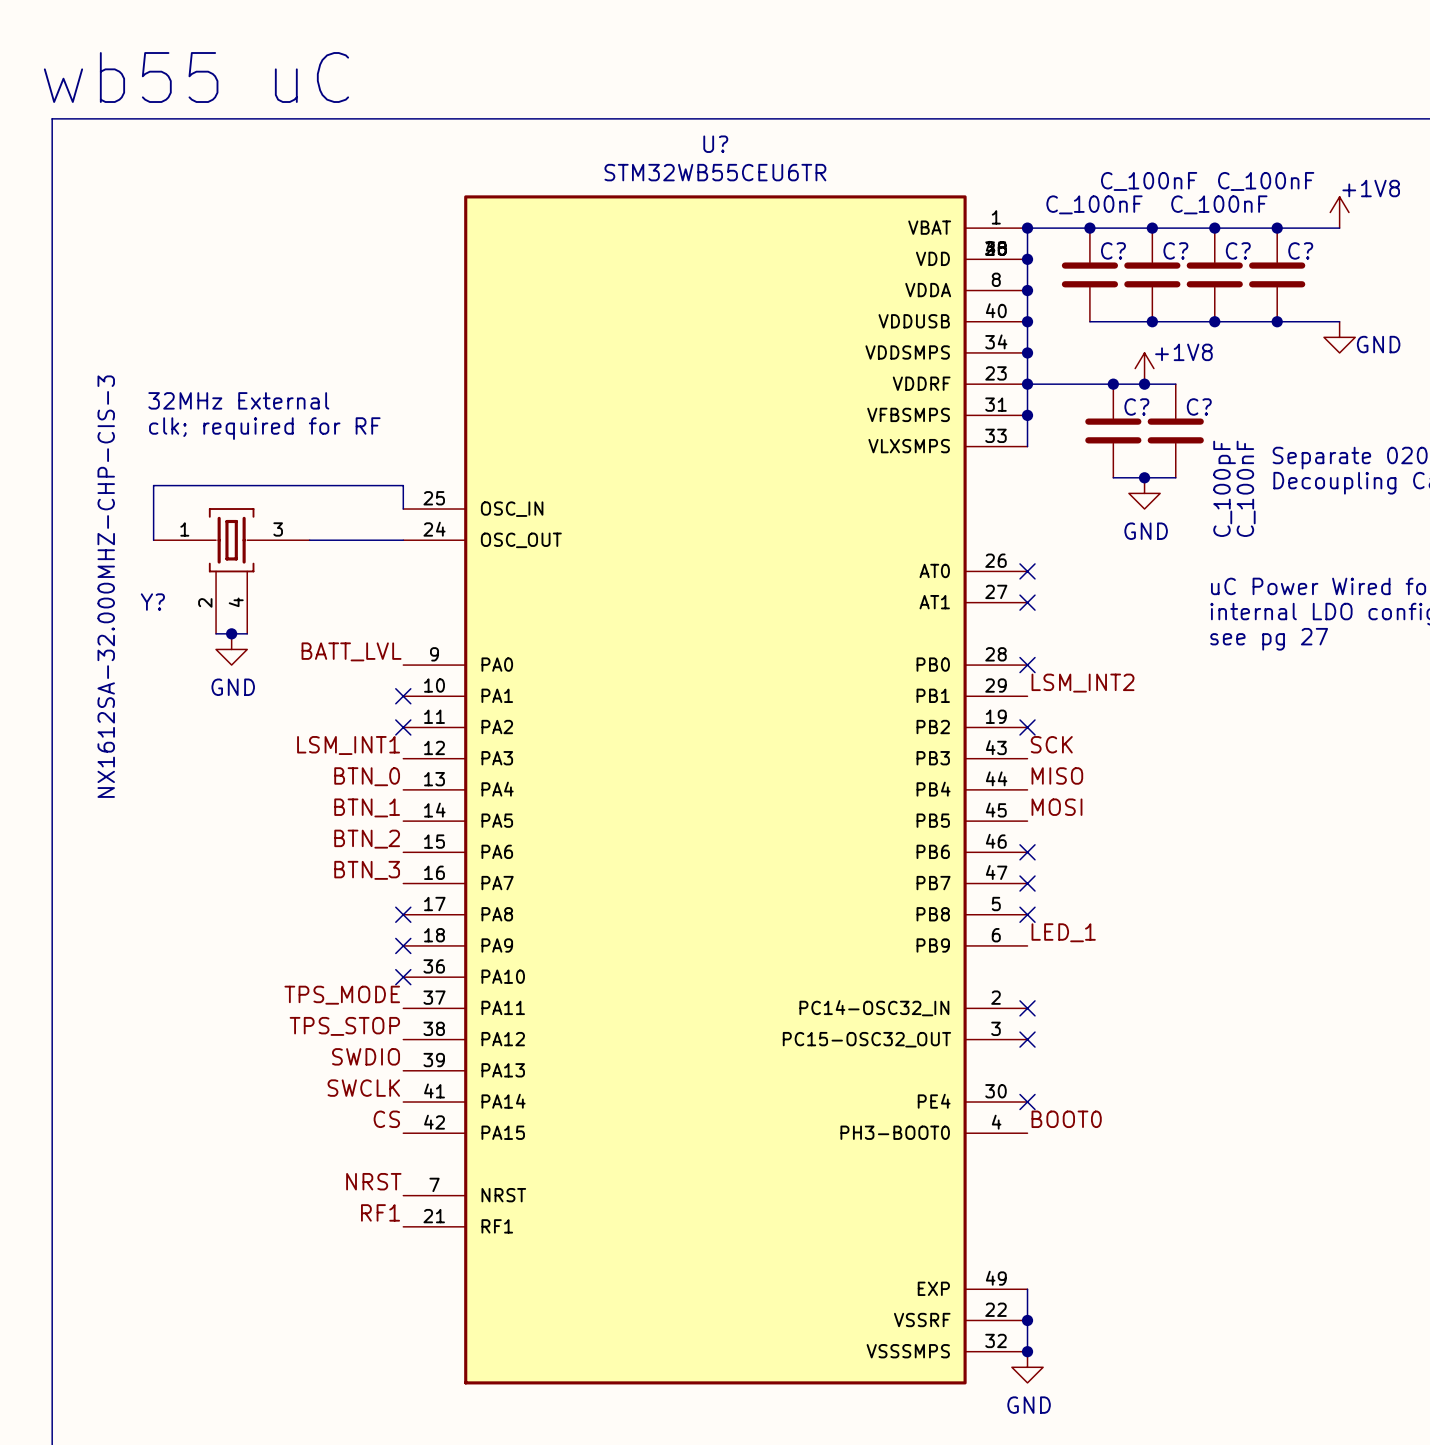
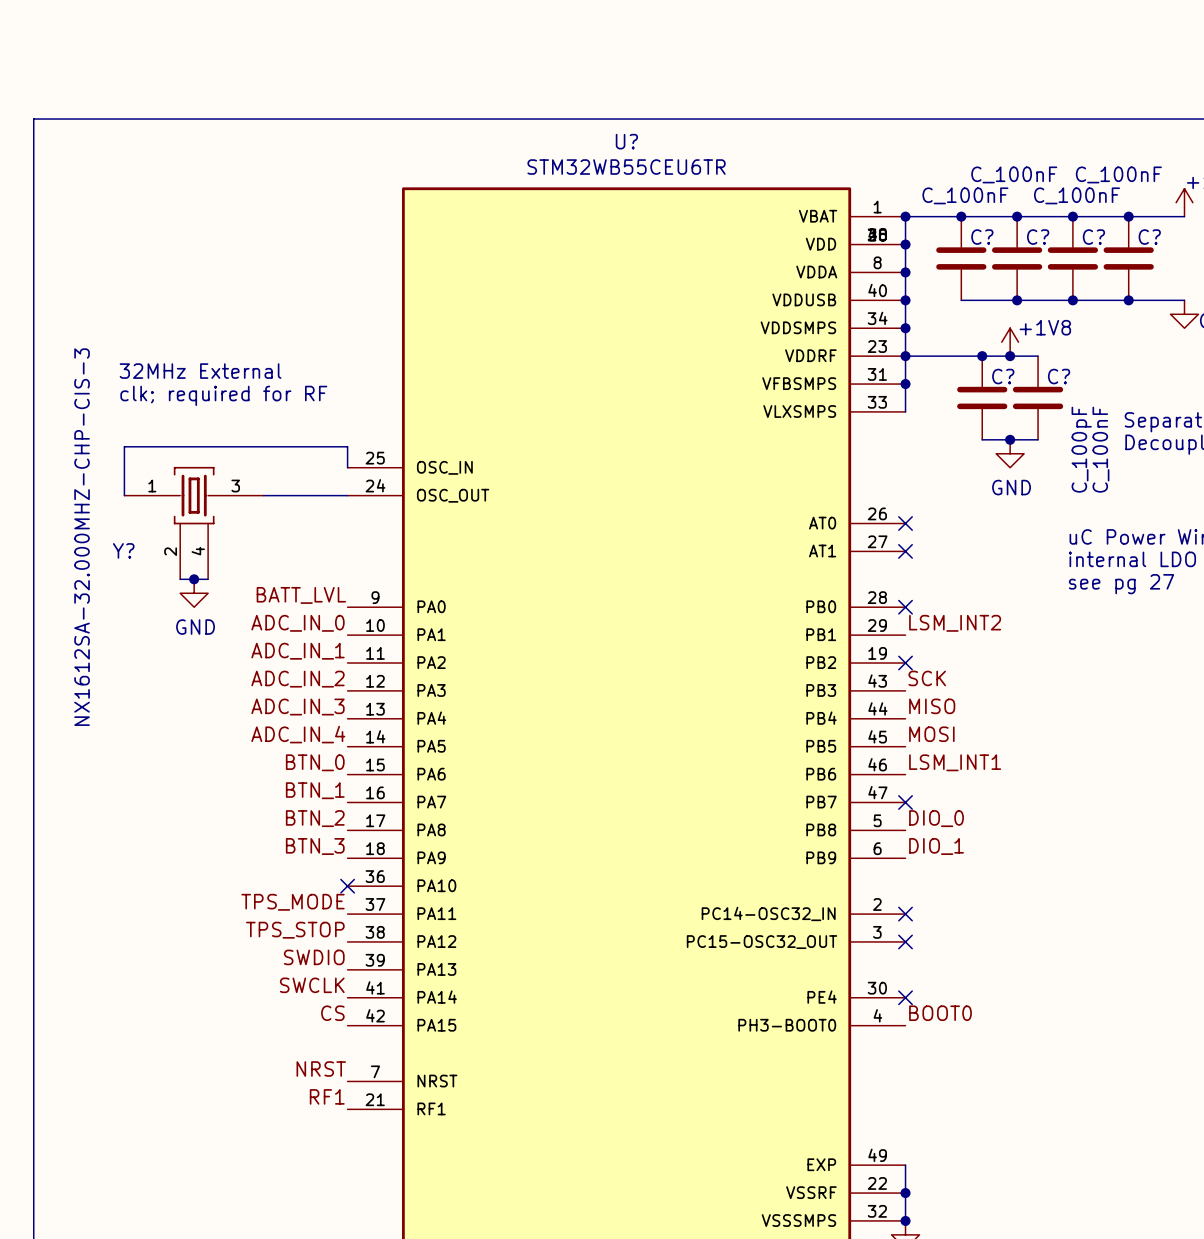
text: wb55 uC (196, 77) -> none
label: none -> ADC_IN_0 (297, 623)
no-connect mark: (403, 696) -> none
label: none -> ADC_IN_1 (297, 651)
no-connect mark: (403, 727) -> none
label: LSM_INT1 (348, 745) -> ADC_IN_2 (297, 679)
label: BTN_0 (367, 776) -> ADC_IN_3 (297, 707)
label: BTN_1 (367, 807) -> ADC_IN_4 (298, 734)
label: BTN_2 (367, 839) -> BTN_0 (315, 762)
label: none -> LSM_INT1 (955, 762)
no-connect mark: (1027, 852) -> none
label: BTN_3 (367, 870) -> BTN_1 (315, 790)
label: none -> BTN_2 (315, 818)
label: none -> DIO_0 (936, 818)
no-connect mark: (403, 914) -> none
no-connect mark: (1027, 914) -> none
label: none -> BTN_3 (315, 846)
label: LED_1 (1063, 932) -> DIO_1 (936, 846)
no-connect mark: (403, 945) -> none

